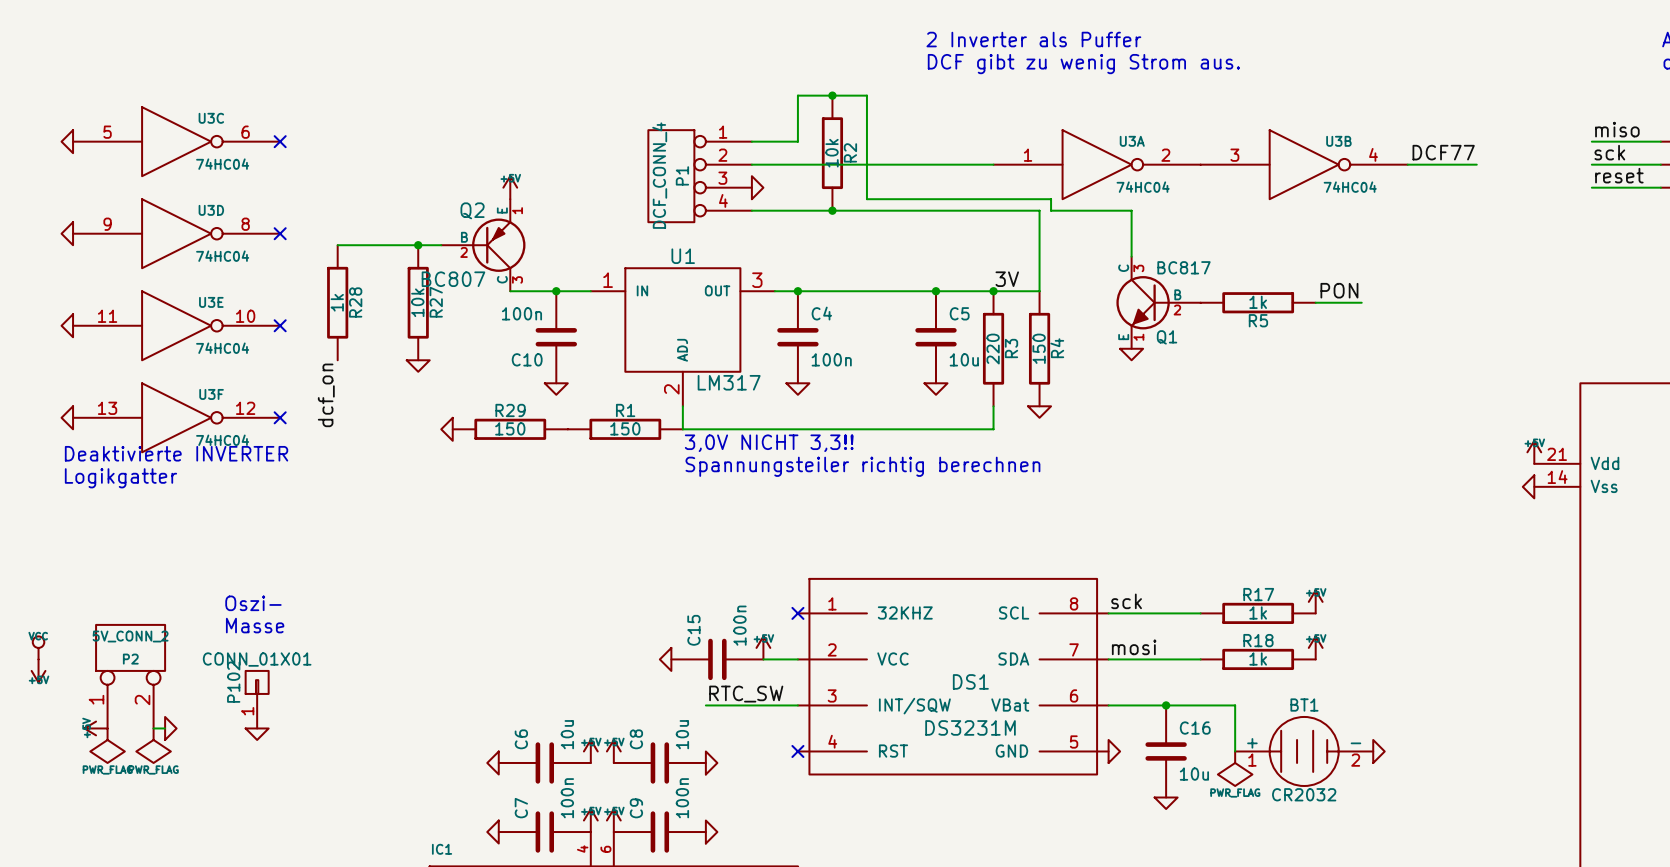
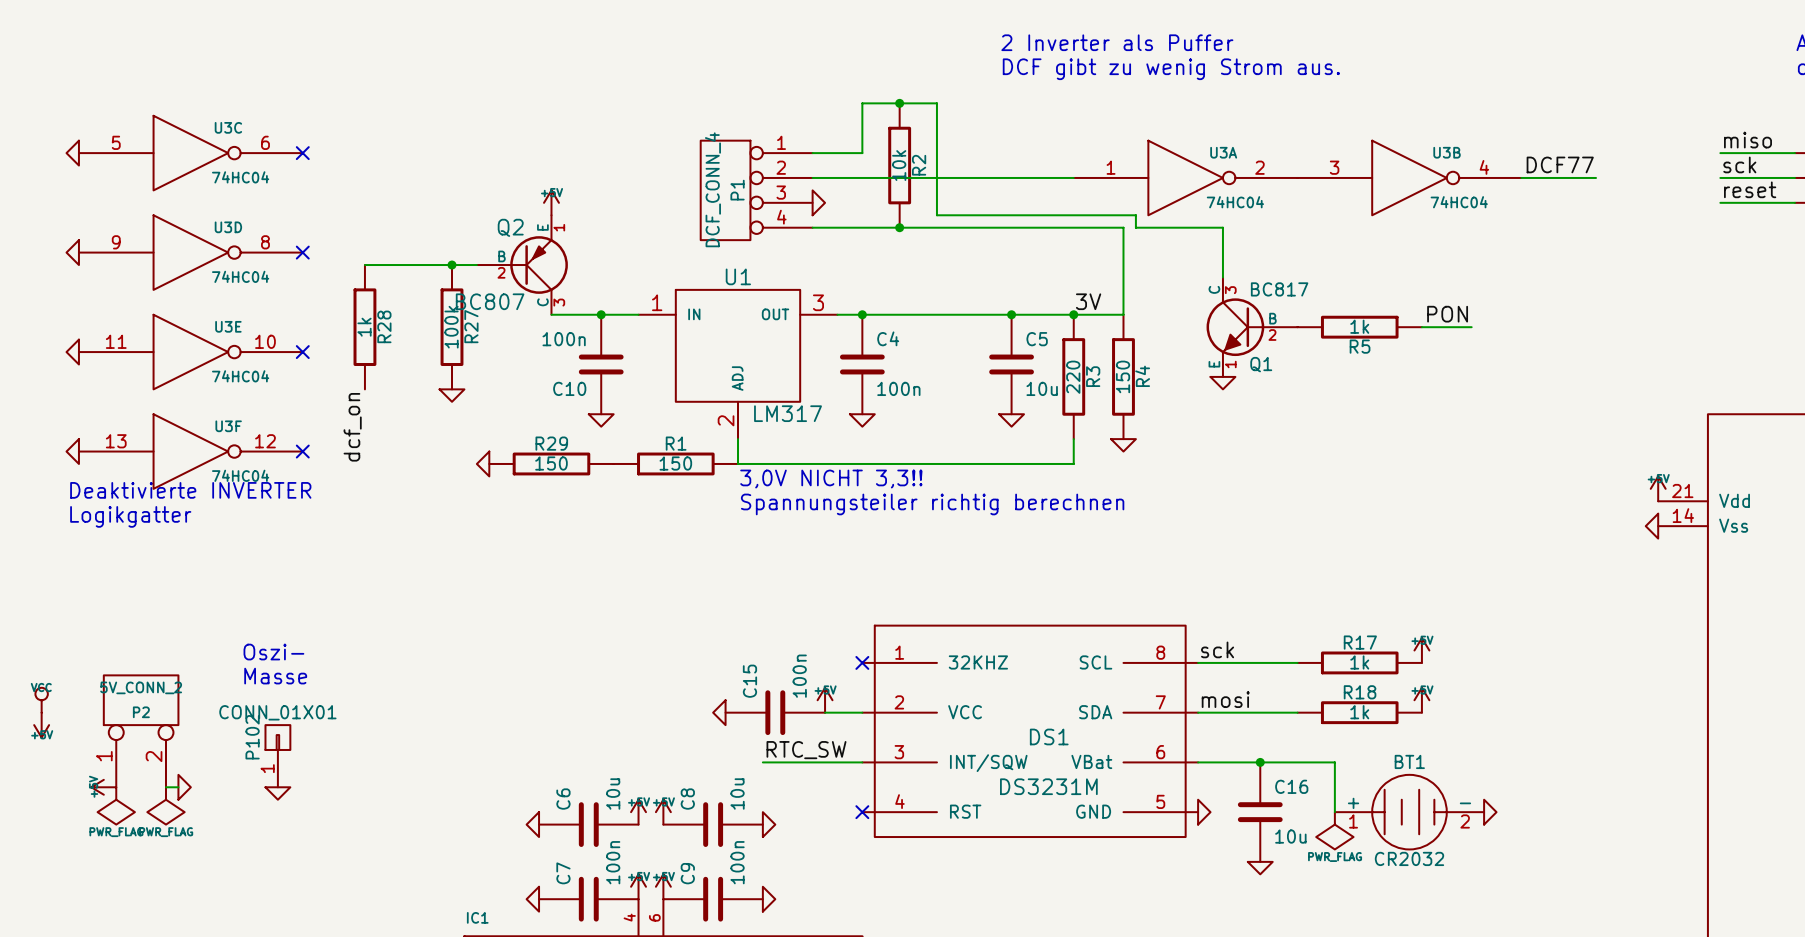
R27 value: 10k (417, 302) -> 100k (451, 327)

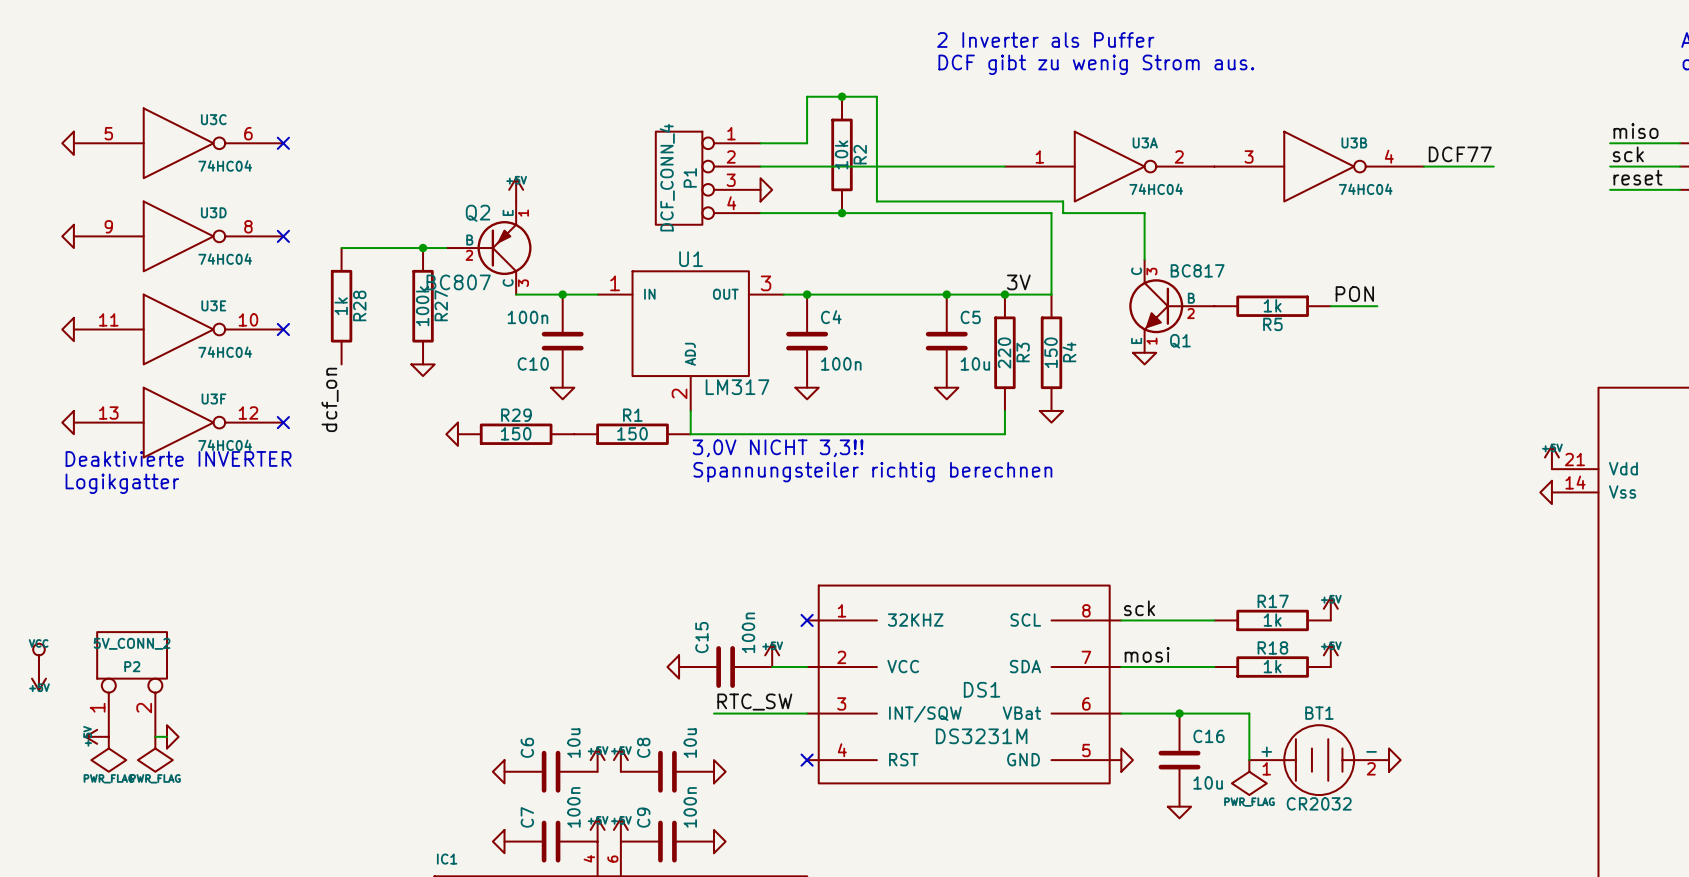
text: Oszi- (273, 652) -> none
text: Masse (275, 676) -> none
P102: CONN_01X01 (277, 756) -> none
power symbol: (277, 793) -> none

